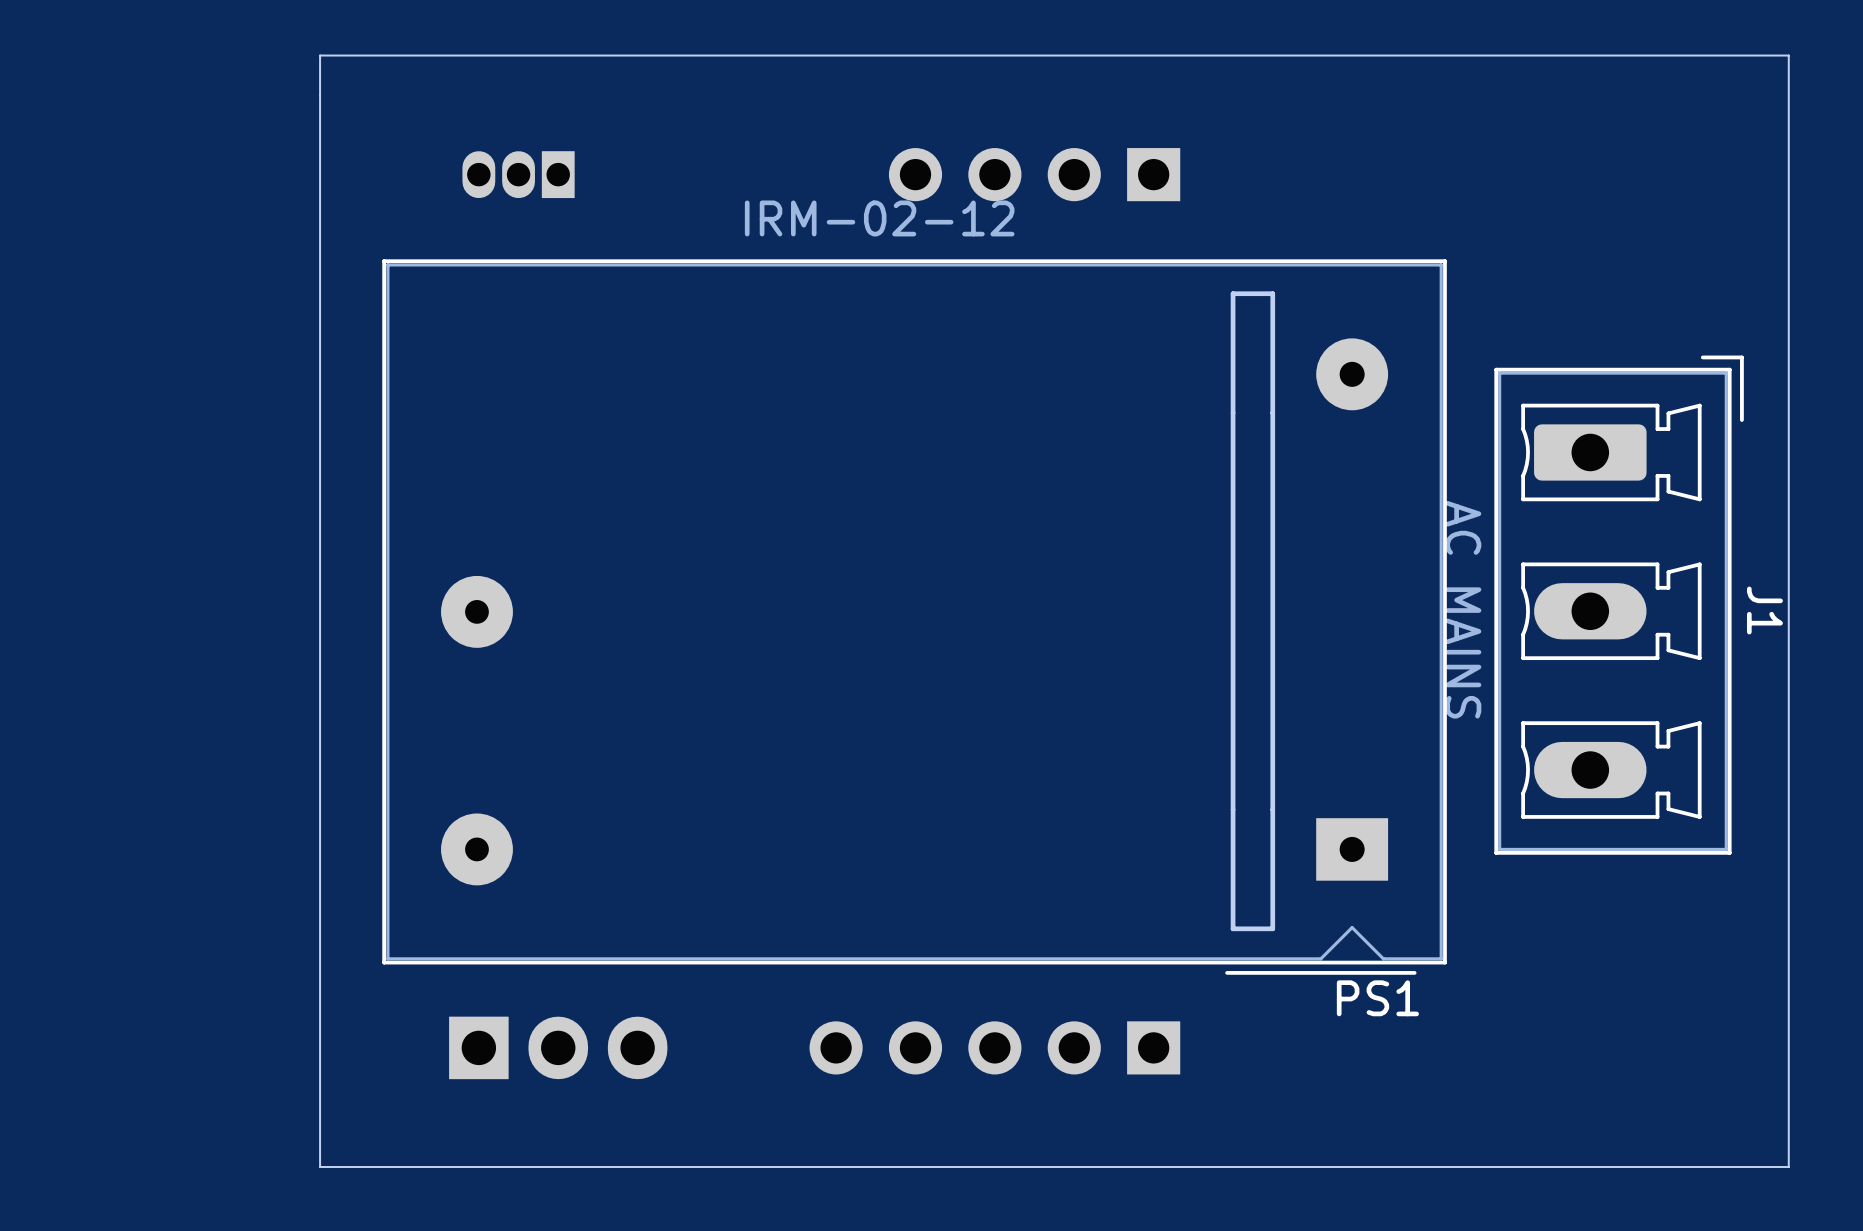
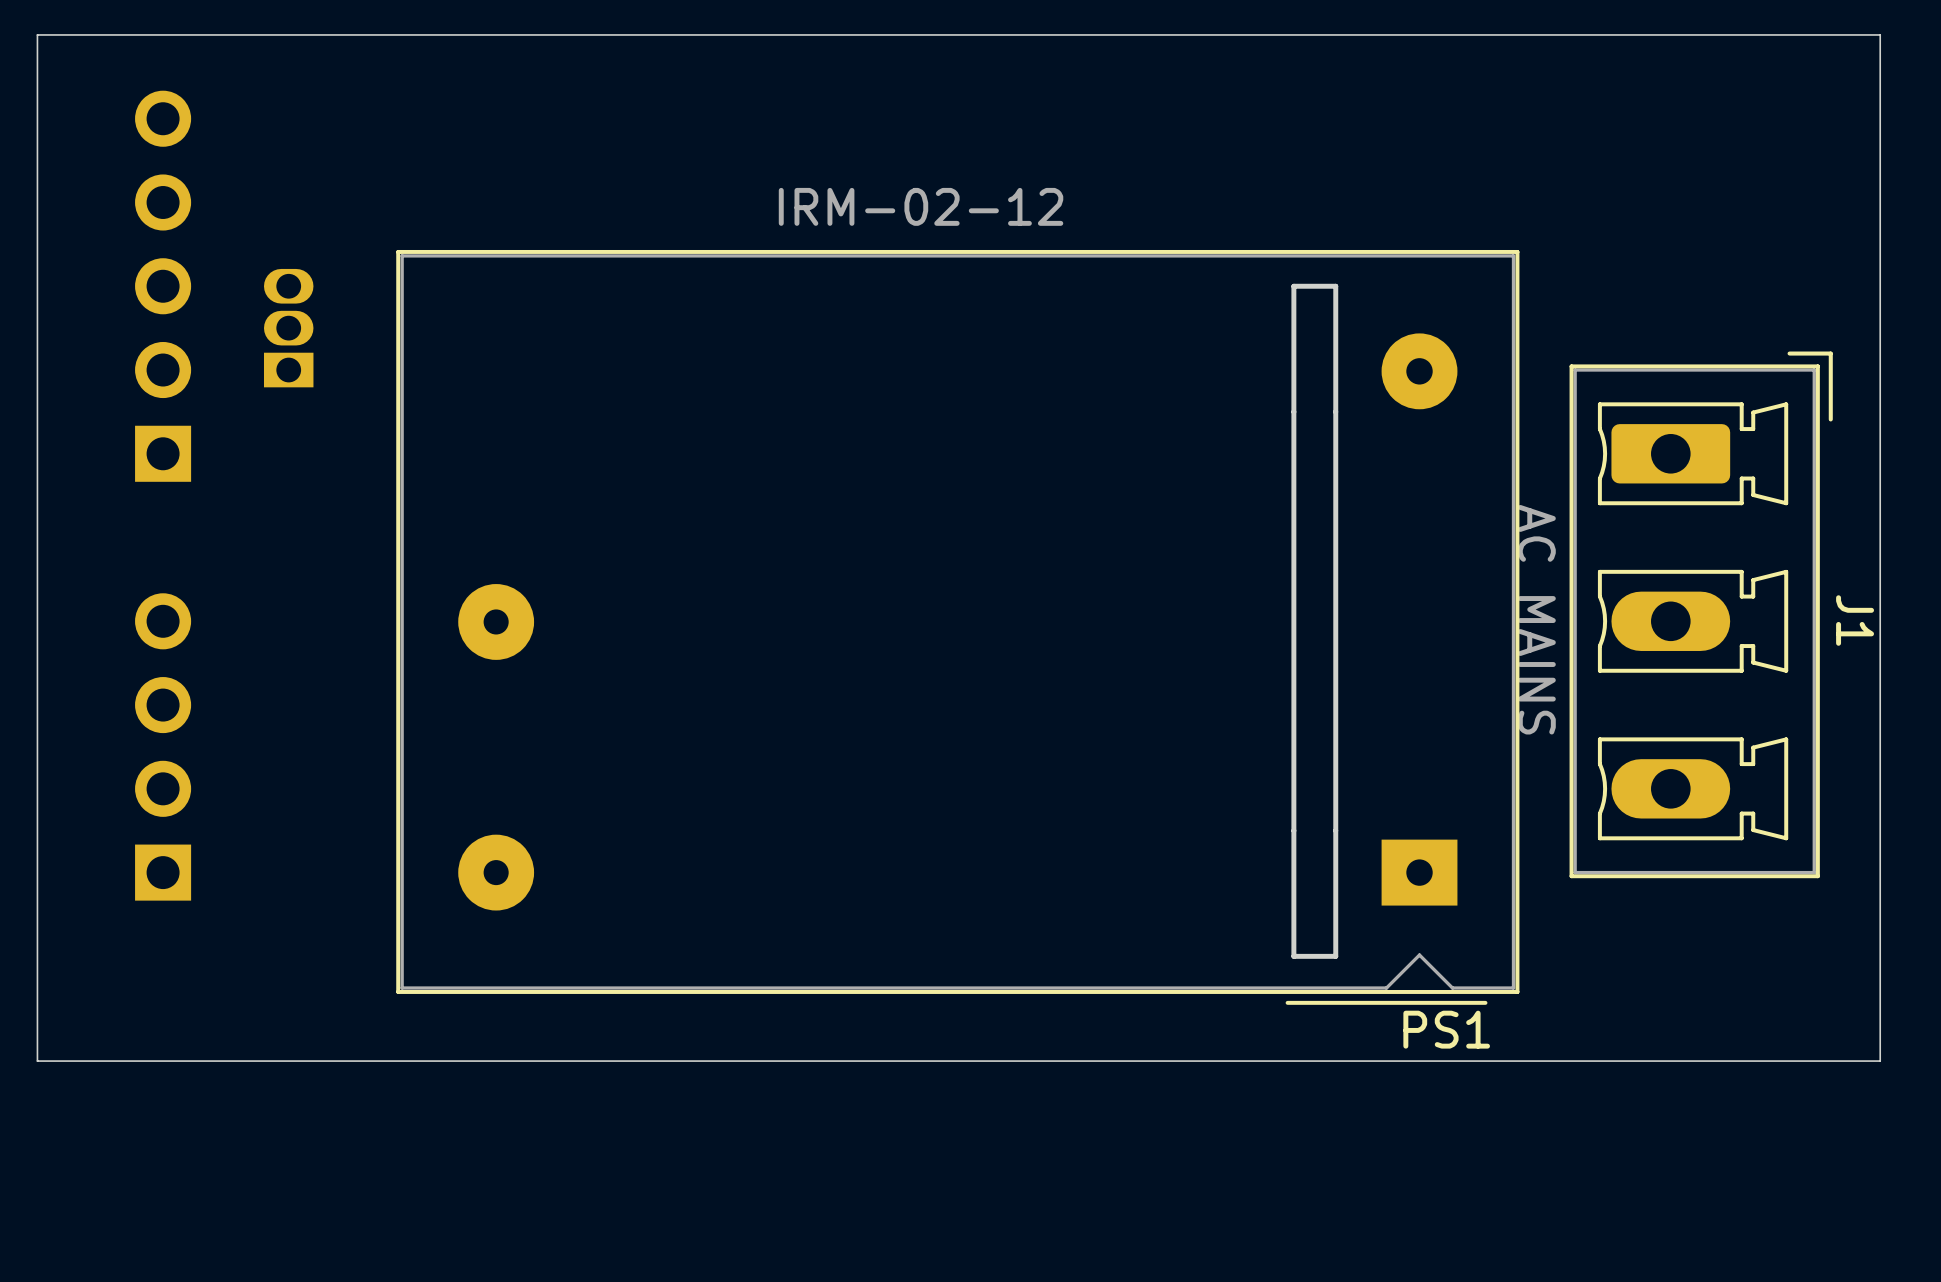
board edge: (320, 55) (320, 1166) (1788, 1166) (1788, 1028) -> (330, 34) (37, 34) (37, 1061) (1880, 1061)
part rotation: 0° (518, 174) -> 90° clockwise (288, 328)
part position: (518, 174) -> (288, 328)
part: (1034, 174) -> none
part: none -> (163, 286)
part: none -> (163, 746)
part: (558, 1047) -> none
part: (994, 1047) -> none

